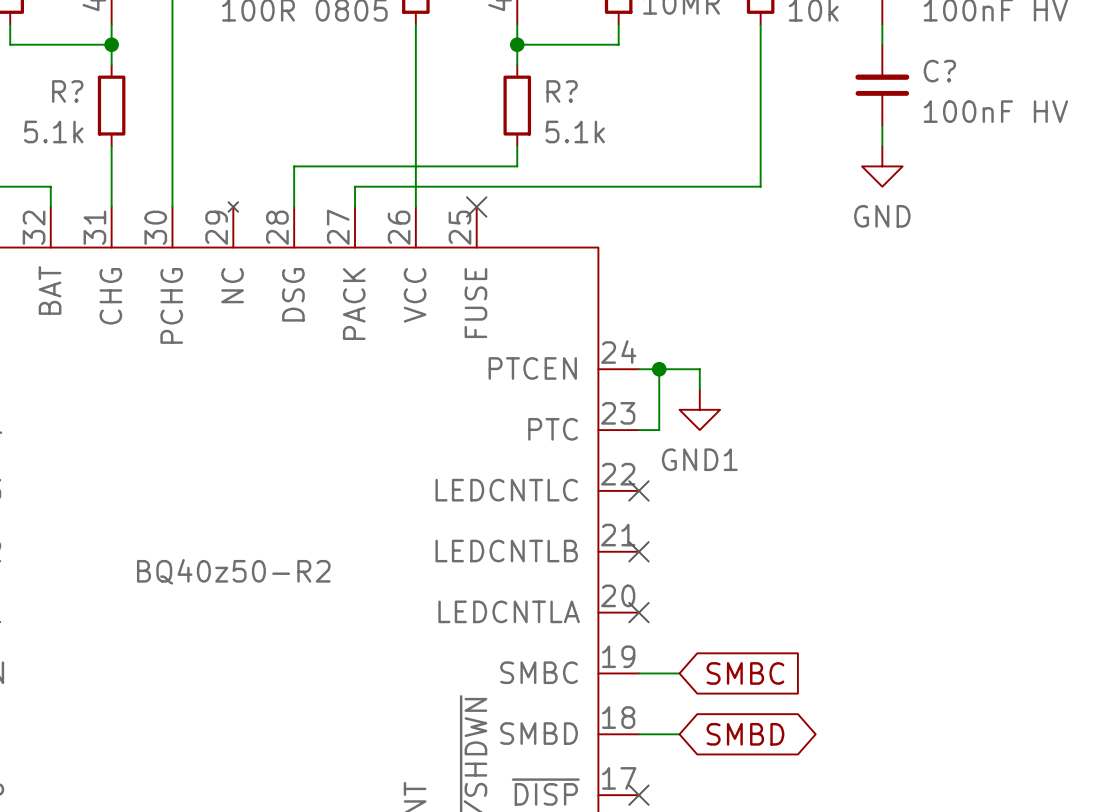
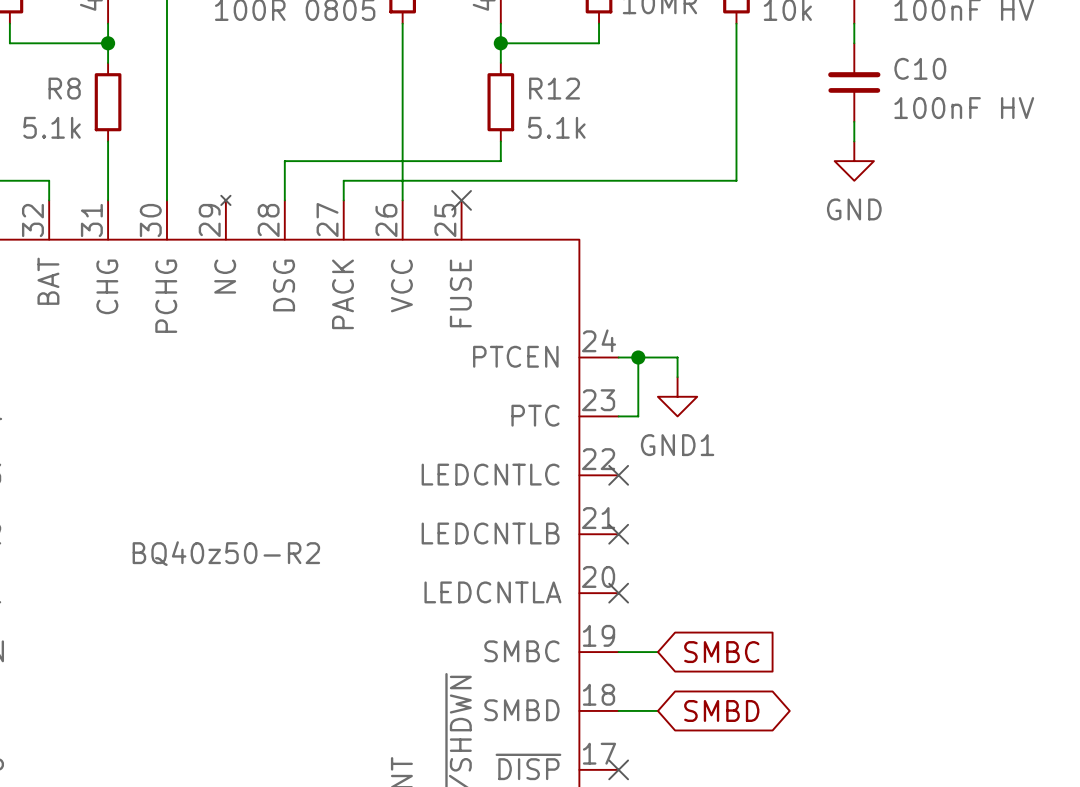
C? name: C? (939, 71) -> C10 (920, 68)
R? name: R? (67, 91) -> R8 (64, 88)
R? name: R? (562, 91) -> R12 (554, 88)

